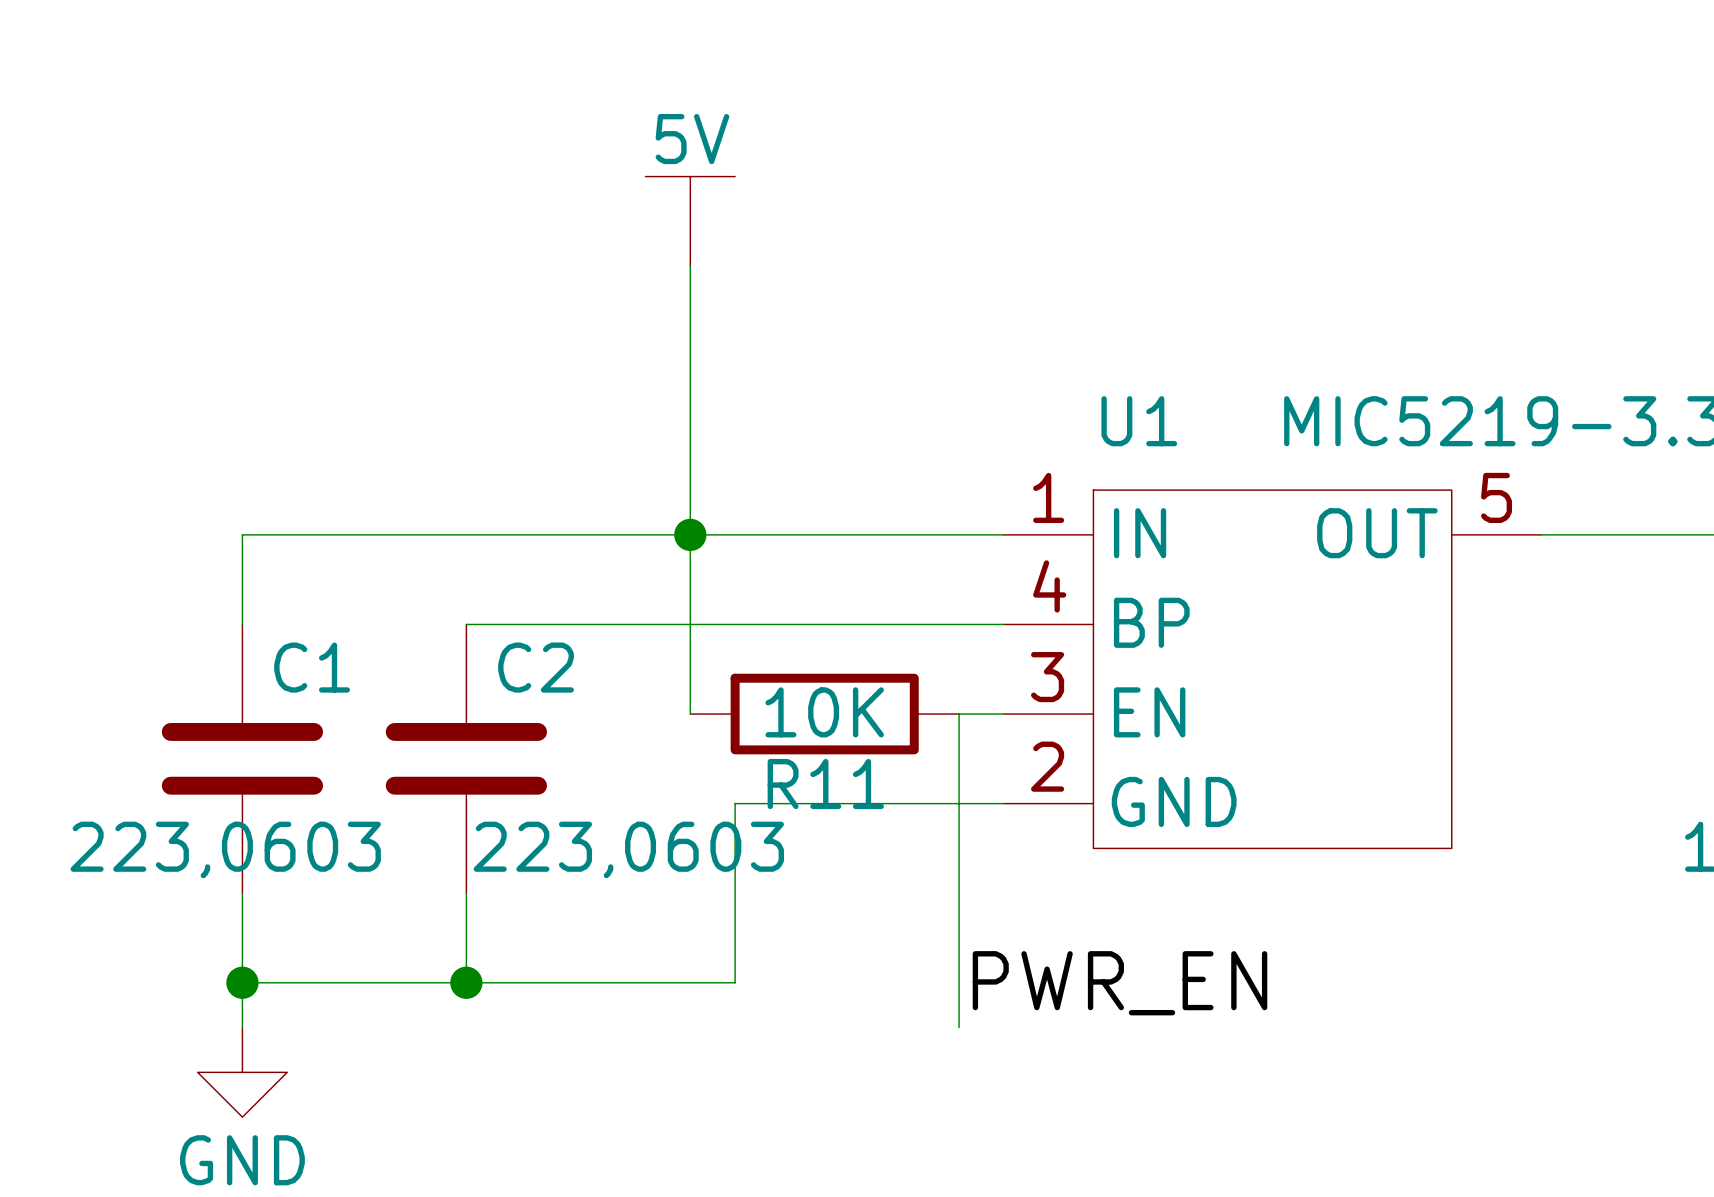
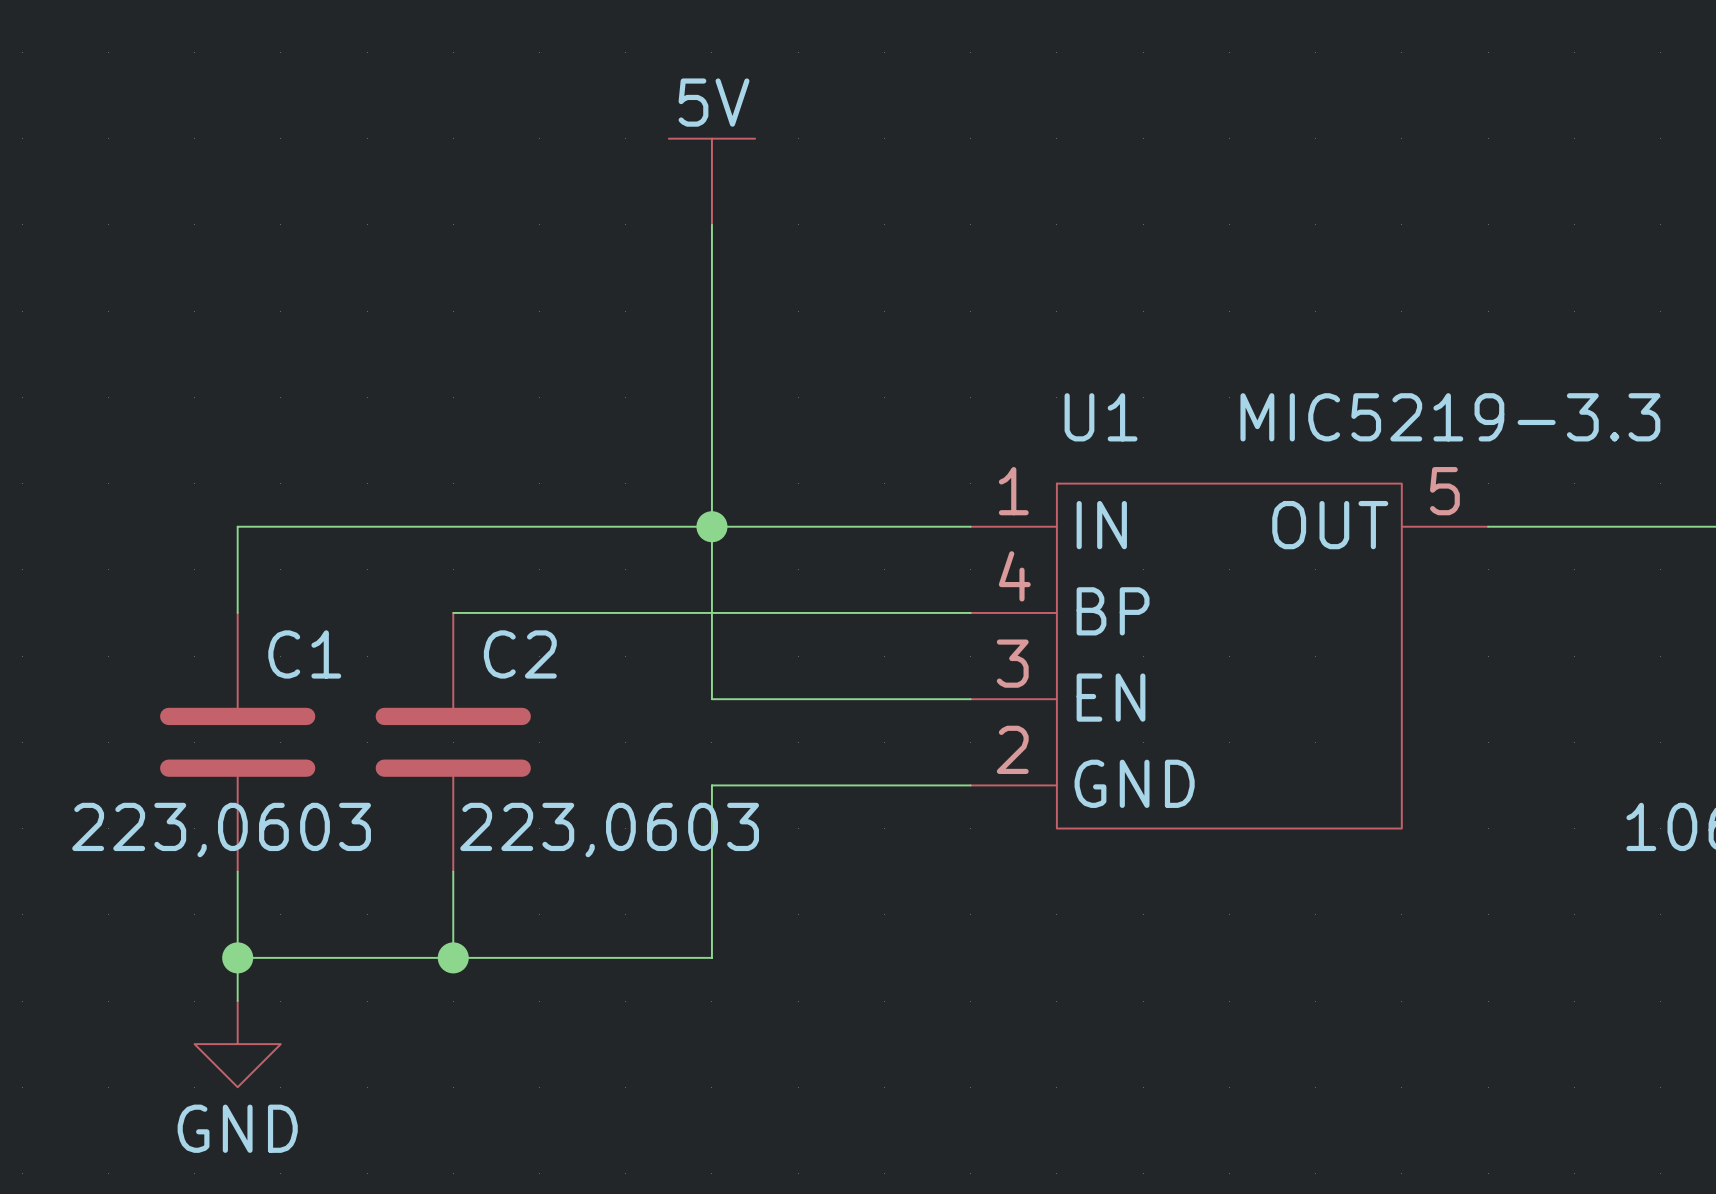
power symbol position: 5V (690, 221) -> 5V (711, 181)
wire: (690, 266) (690, 714) -> none
junction position: (690, 534) -> (711, 526)
R11: 10K (824, 714) -> none
wire: (959, 714) (959, 1027) -> (927, 699) (711, 699) (711, 224)
label: PWR_EN (1120, 983) -> none

